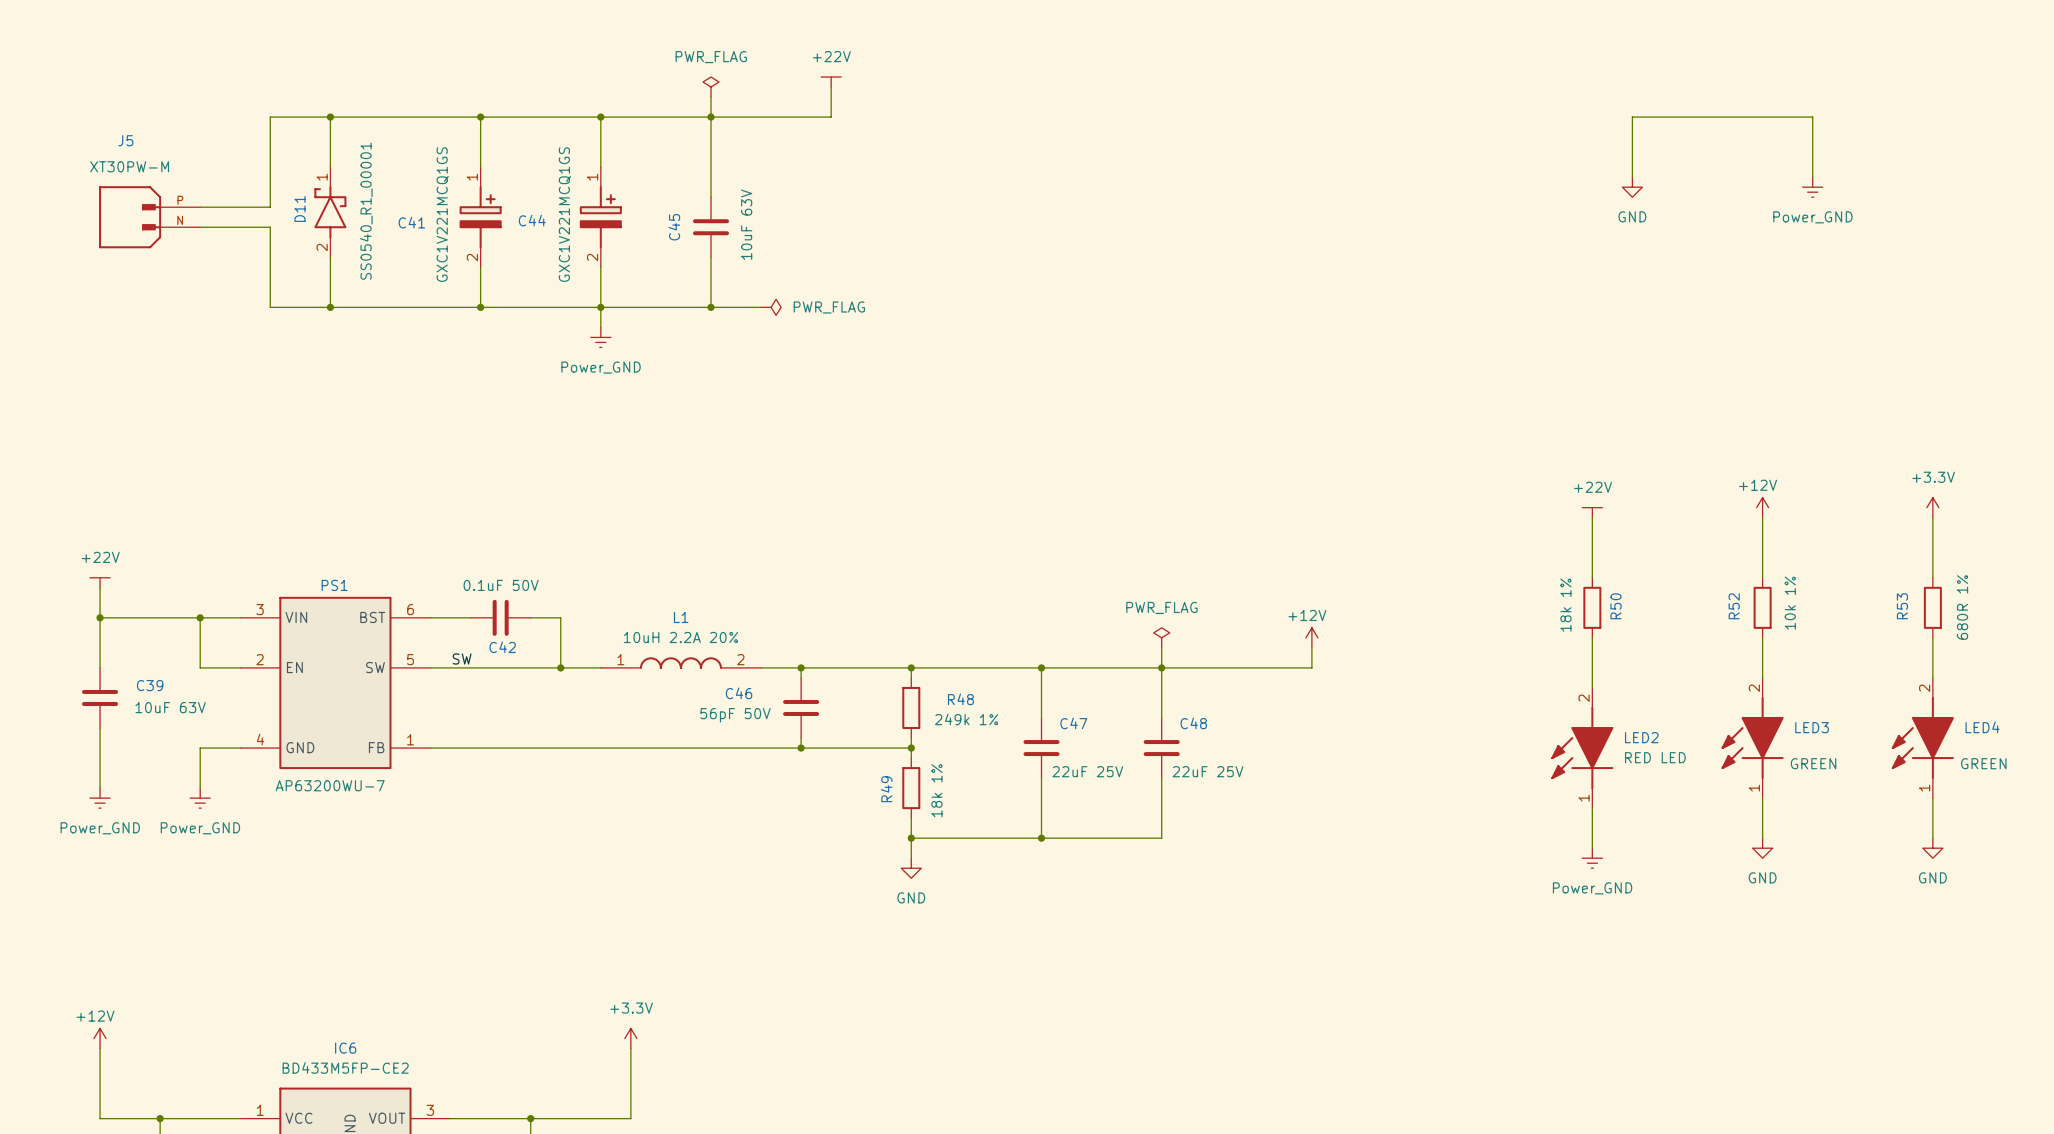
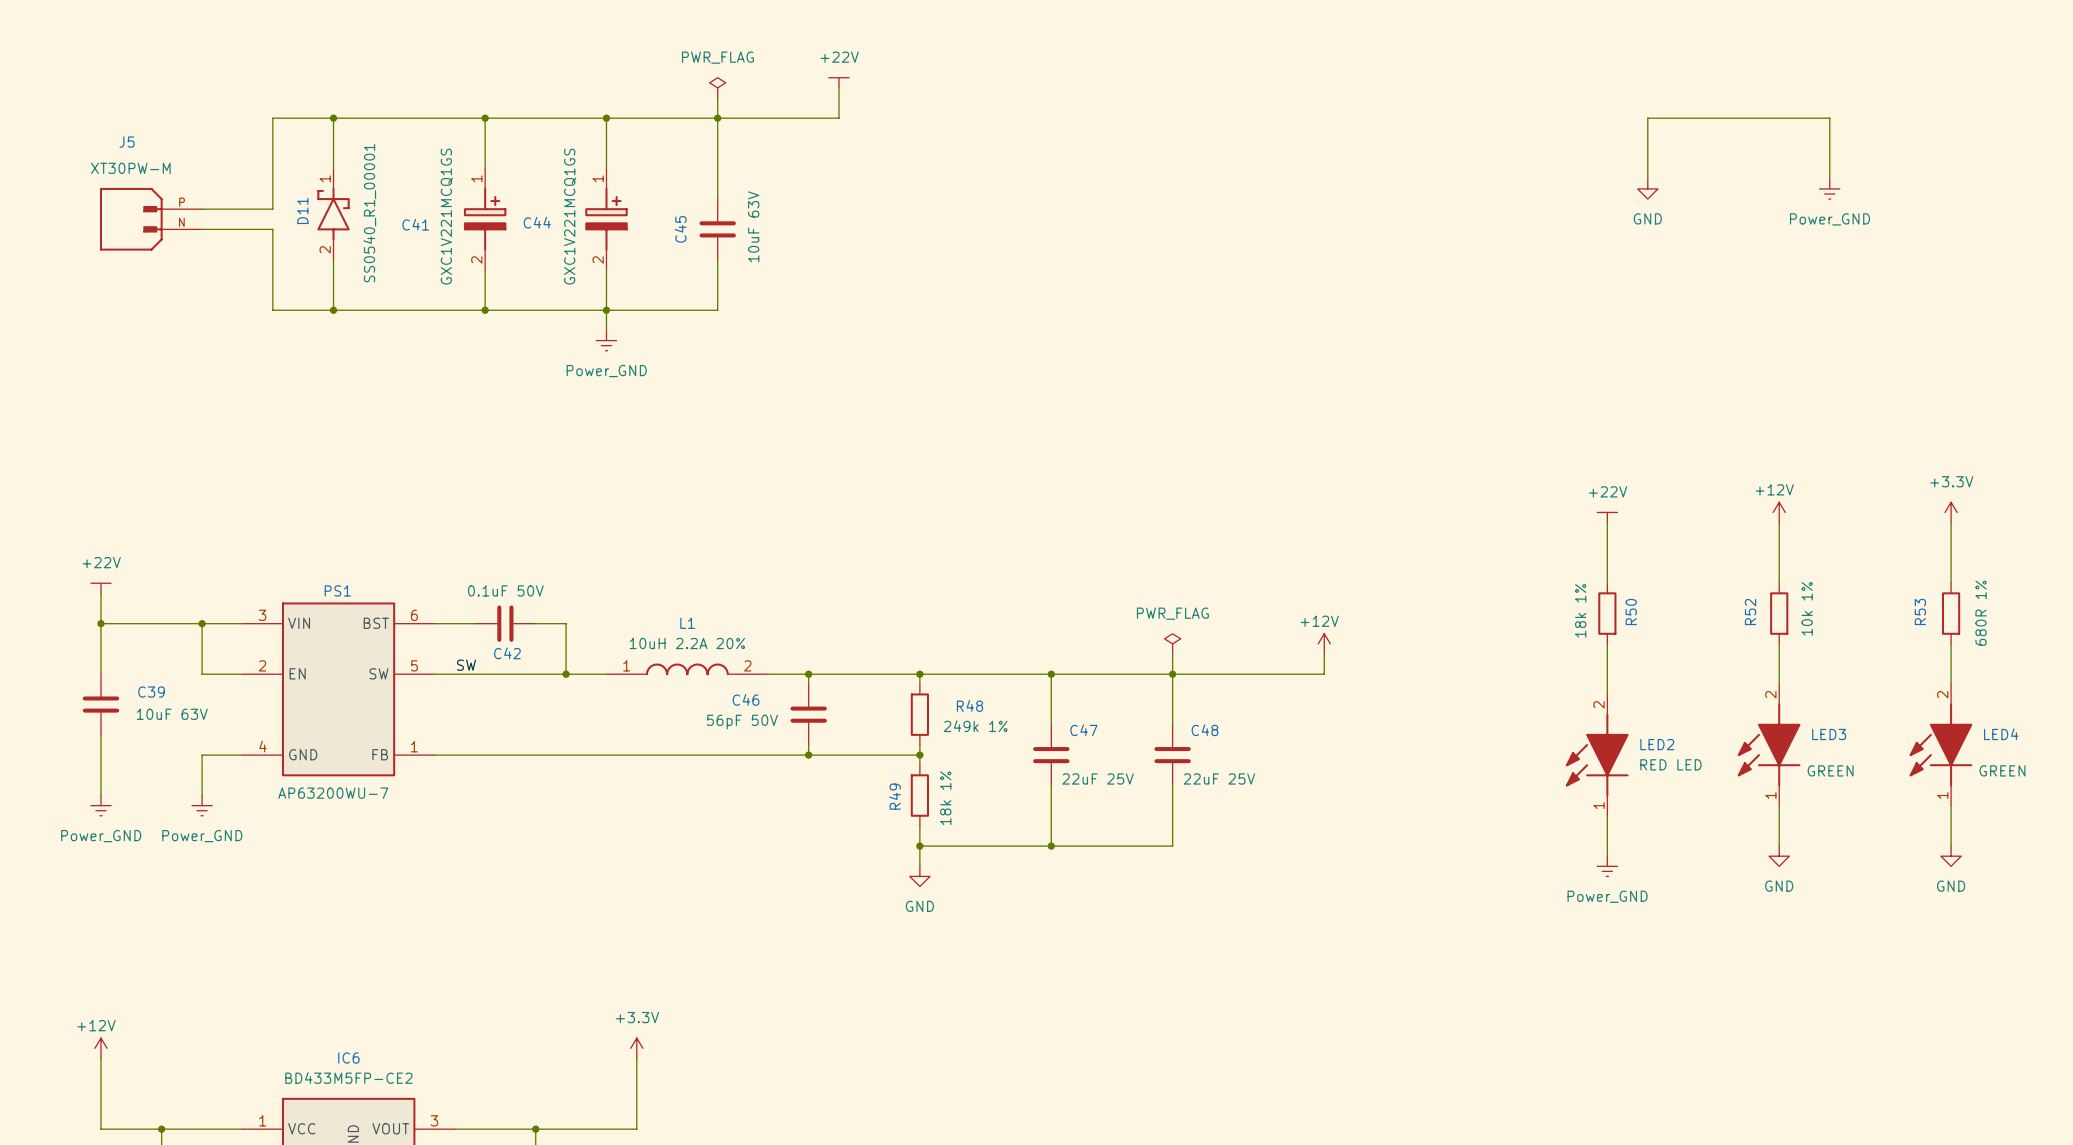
wire: (710, 307) (761, 307) -> none
junction: (710, 307) -> none
power symbol: PWR_FLAG (771, 307) -> none

